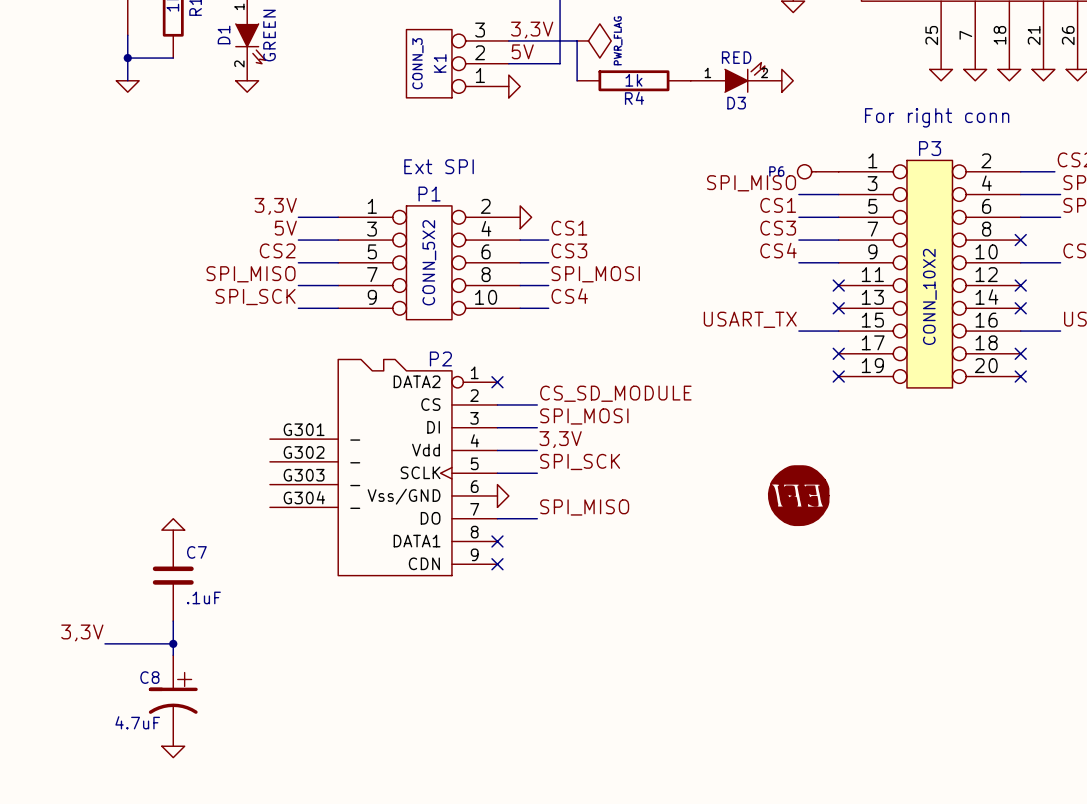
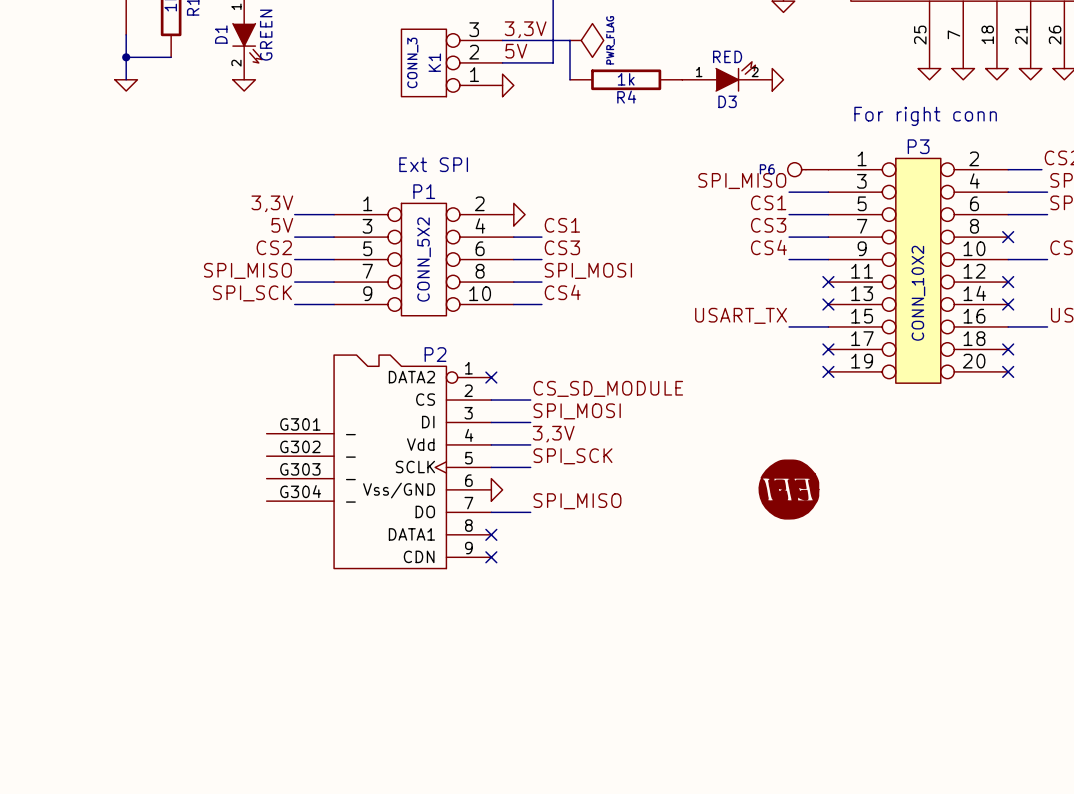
power symbol: (173, 524) -> none
C7: .1uF (173, 575) -> none
wire: (173, 621) (173, 655) -> none
label: 3,3V (82, 632) -> none
wire: (105, 643) (173, 643) -> none
junction: (173, 643) -> none
C8: 4.7uF (173, 700) -> none
power symbol: (173, 751) -> none

